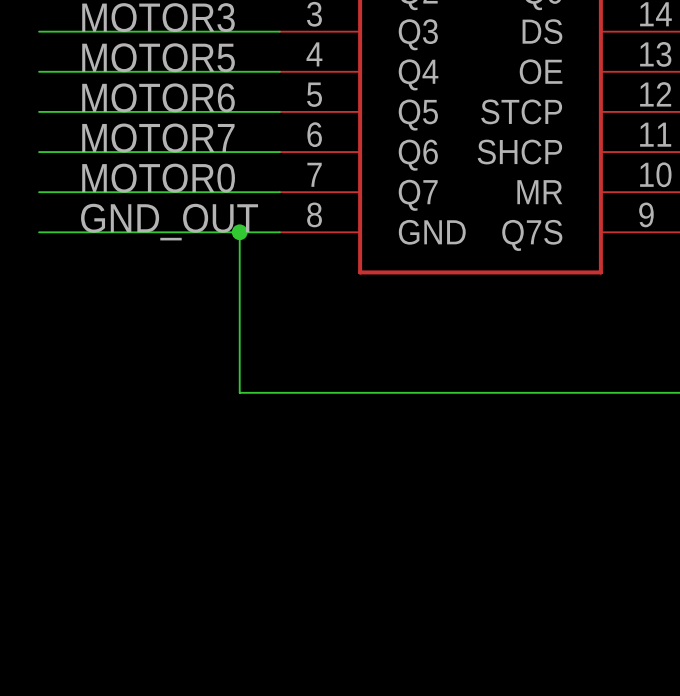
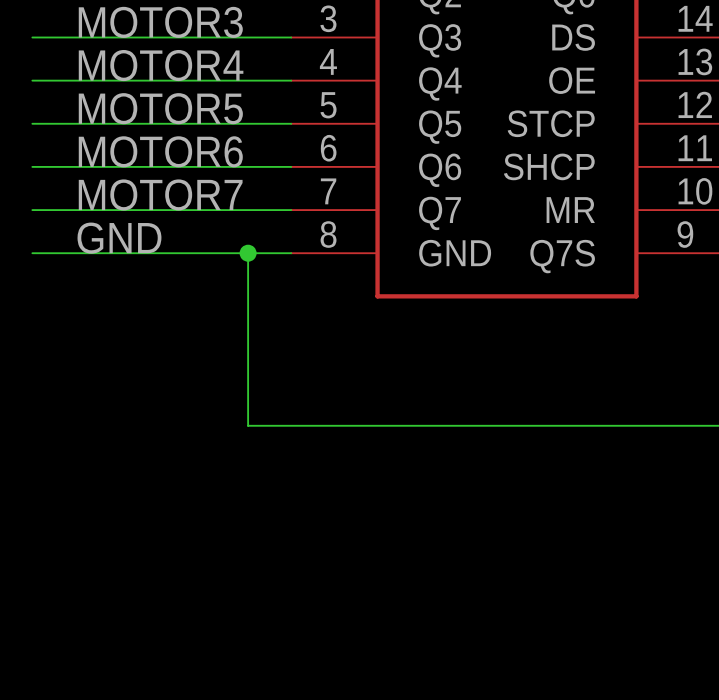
label: MOTOR5 (158, 57) -> MOTOR4 (161, 65)
label: MOTOR6 (158, 97) -> MOTOR5 (160, 108)
label: MOTOR7 (158, 137) -> MOTOR6 (160, 151)
label: MOTOR0 (158, 178) -> MOTOR7 (160, 194)
label: GND_OUT (169, 222) -> GND (119, 238)

